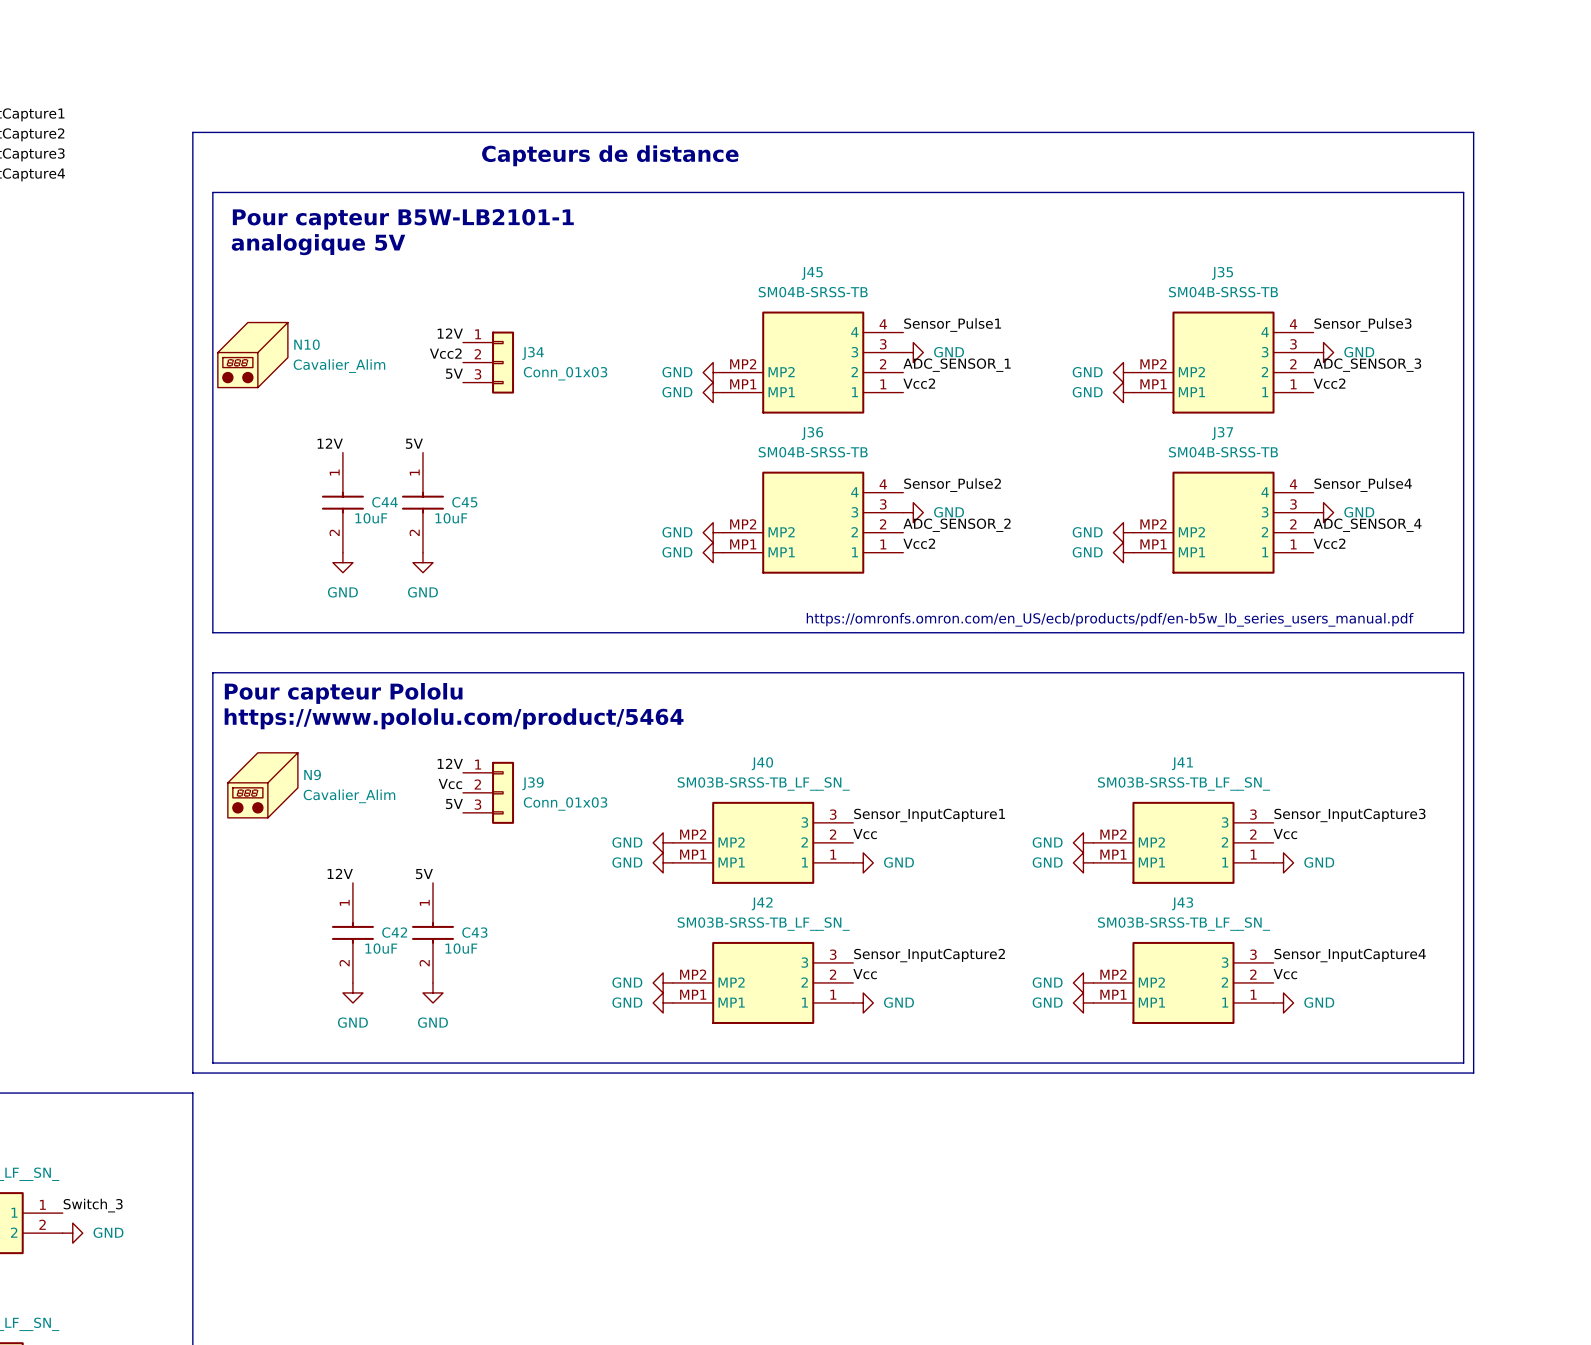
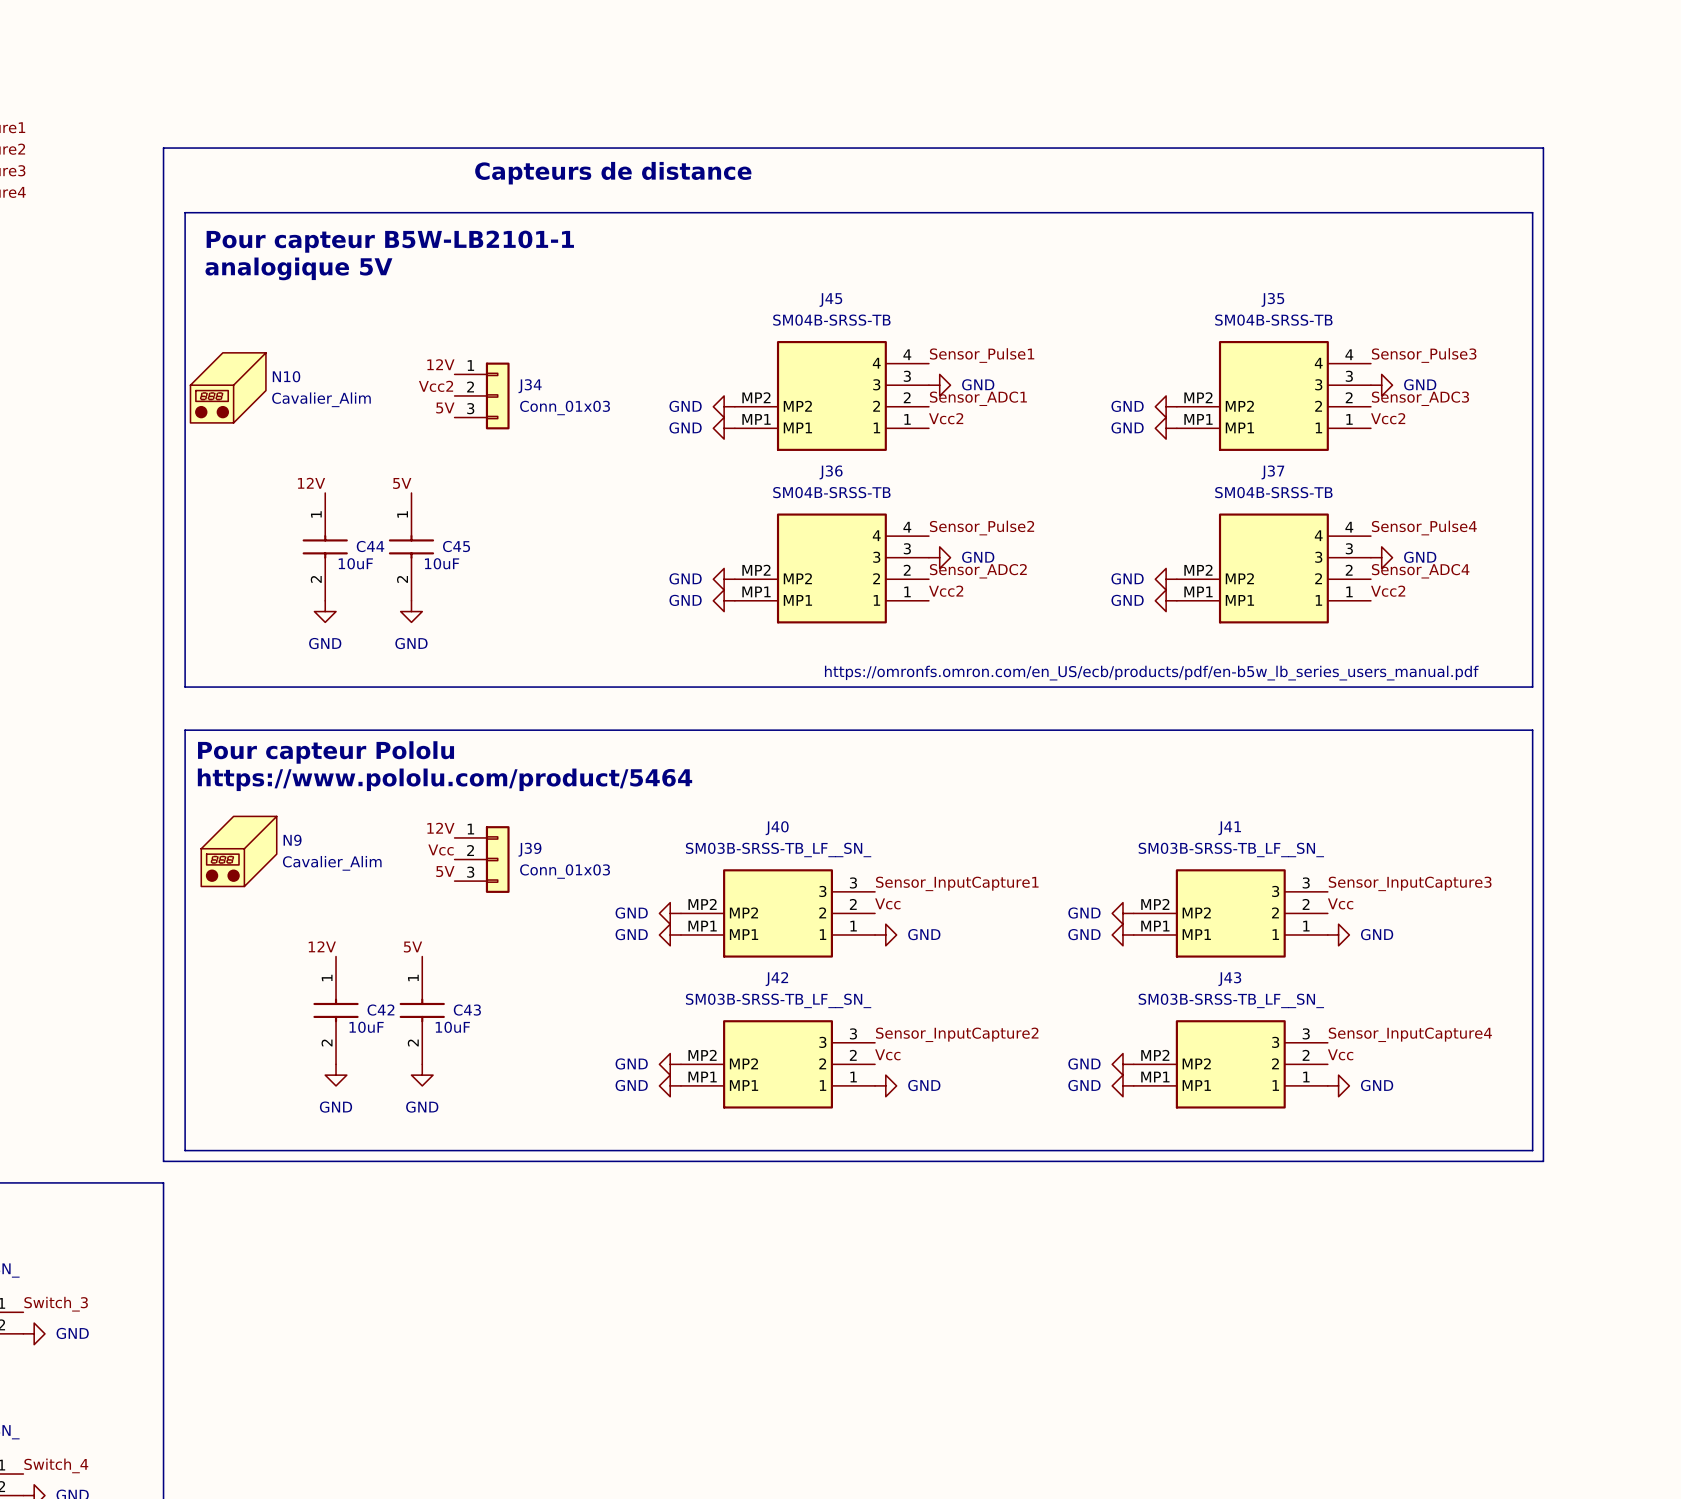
label: ADC_SENSOR_1 (957, 365) -> Sensor_ADC1 (978, 398)
label: ADC_SENSOR_3 (1367, 365) -> Sensor_ADC3 (1420, 398)
label: ADC_SENSOR_2 (957, 525) -> Sensor_ADC2 (978, 571)
label: ADC_SENSOR_4 (1367, 525) -> Sensor_ADC4 (1420, 571)

